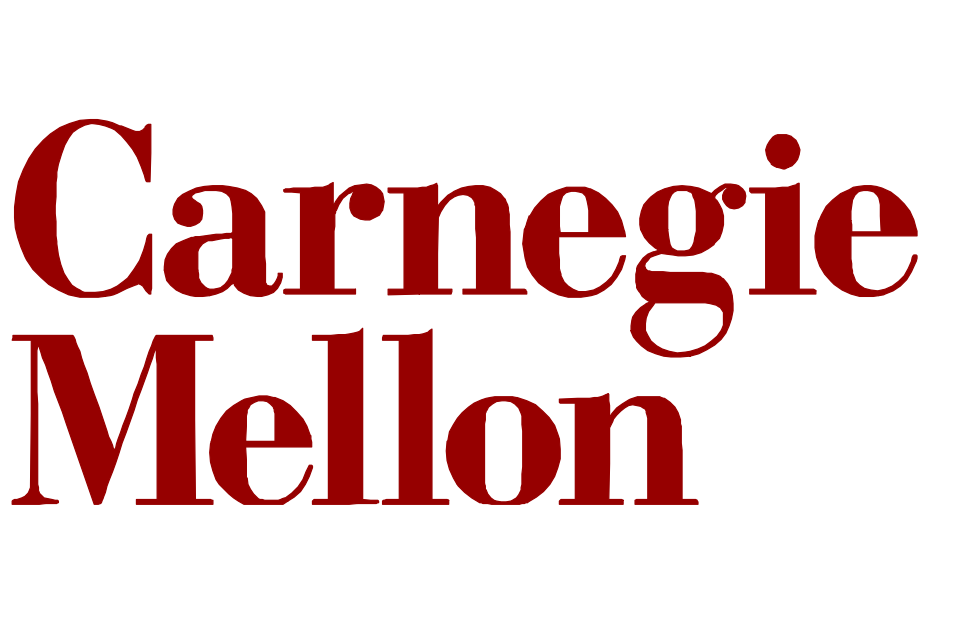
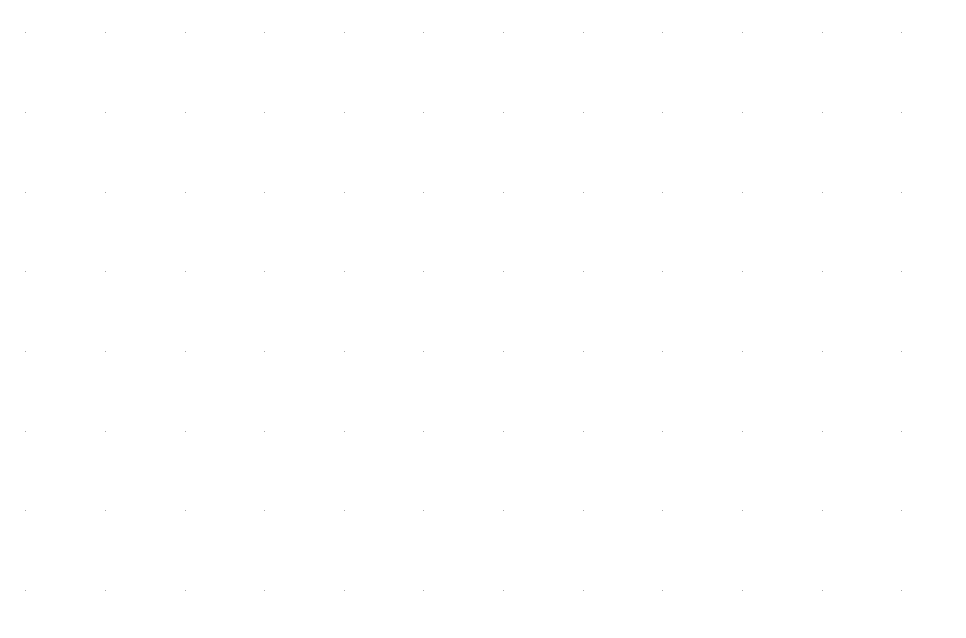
part: (464, 311) -> none

